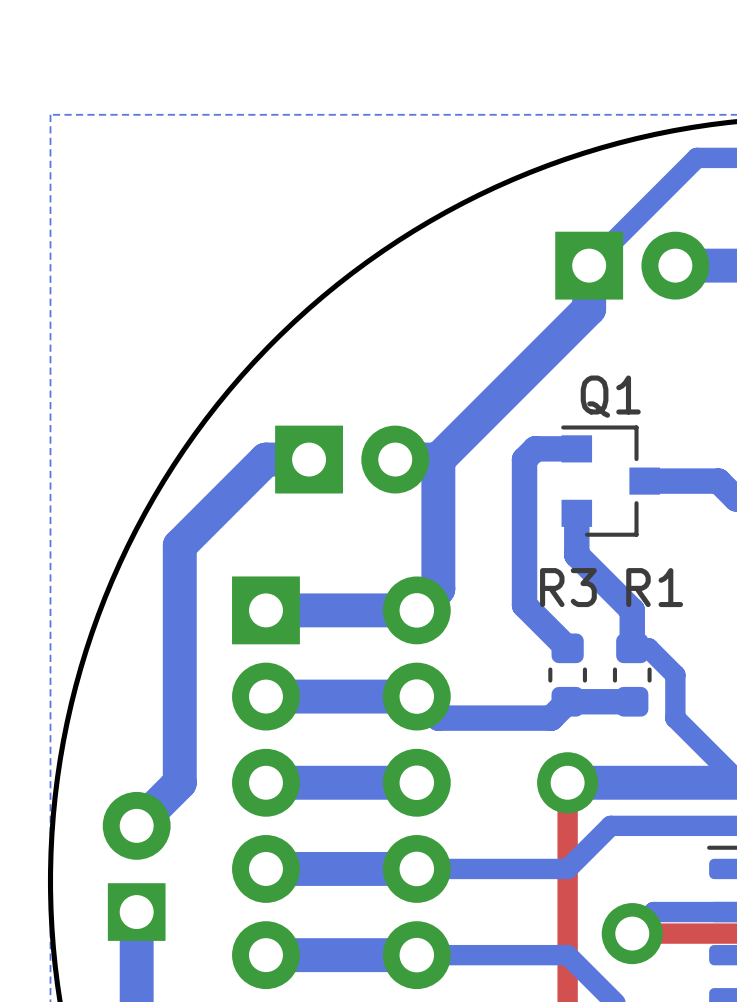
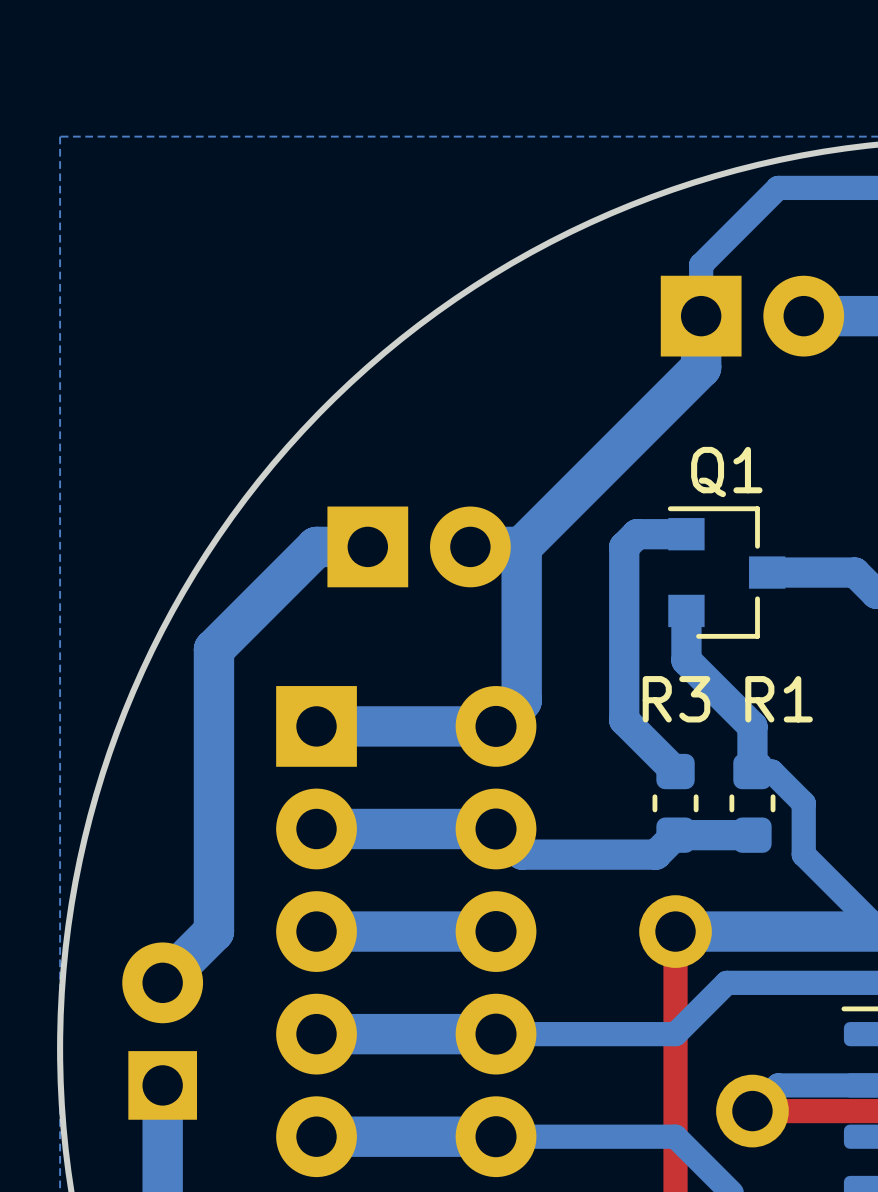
bottom track: (696, 157) (589, 265) -> (829, 187) (778, 187) (701, 264) (701, 316)

